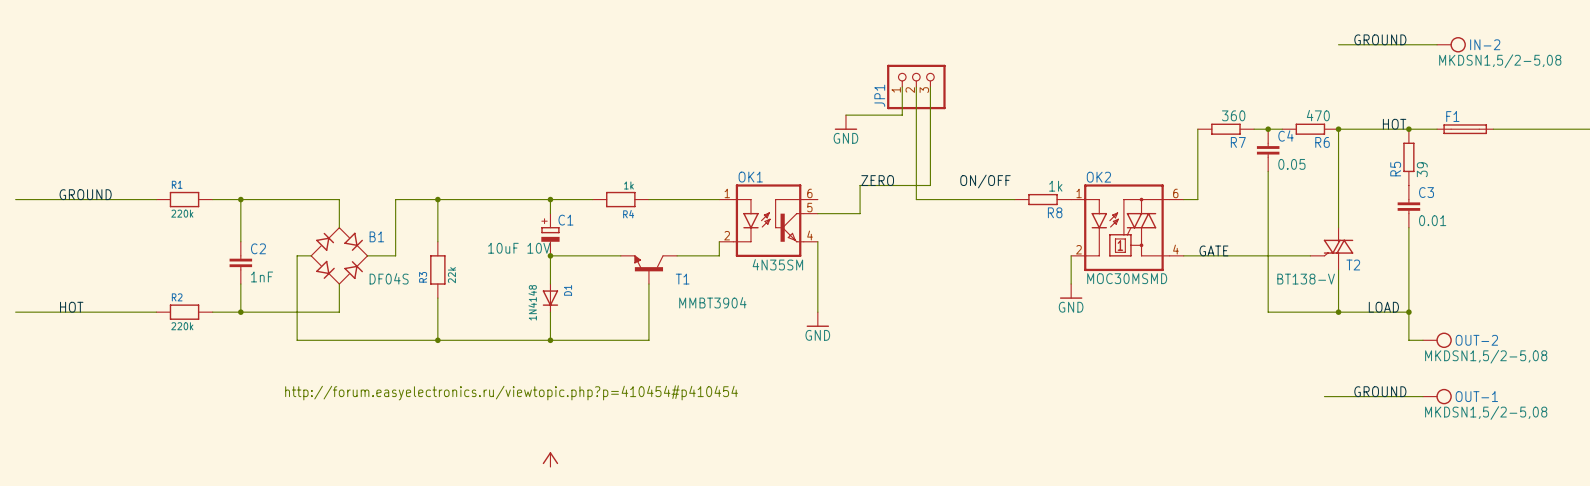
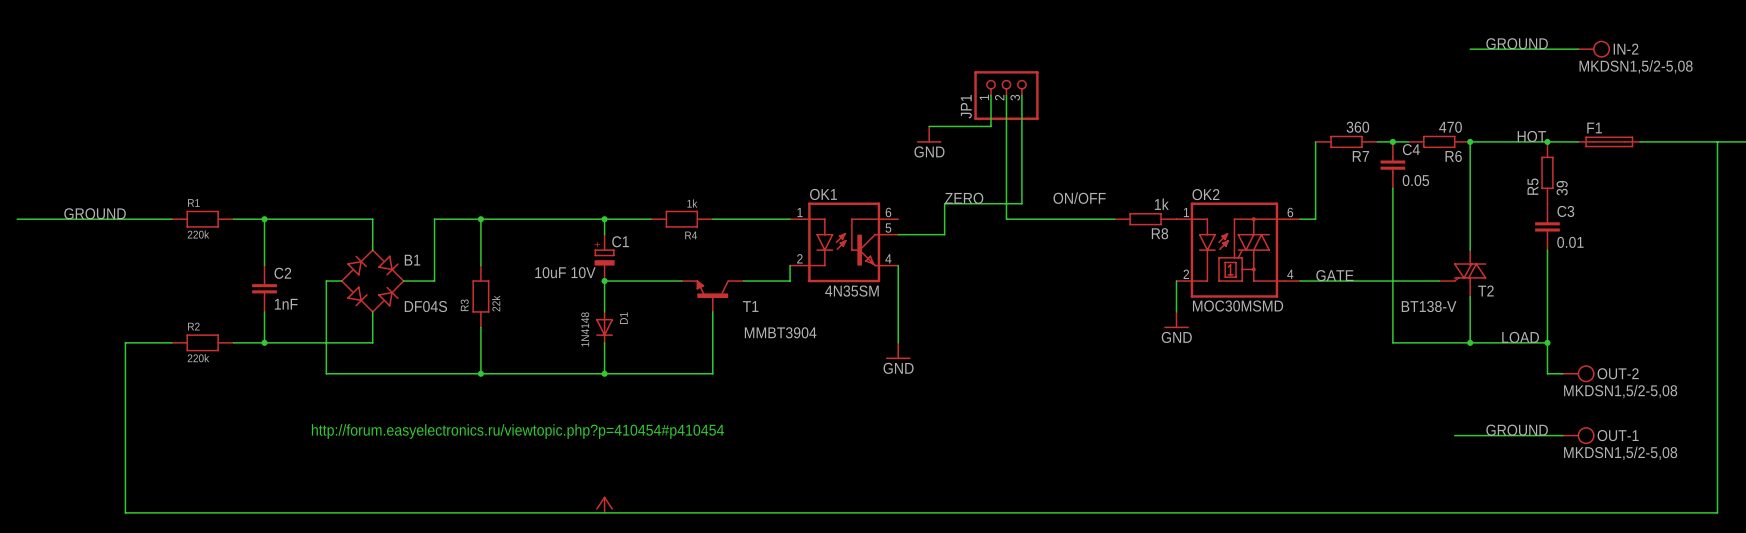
label: HOT (71, 307) -> none
wire: (15, 312) (114, 312) -> (1717, 141) (1717, 512) (125, 512) (125, 342)

